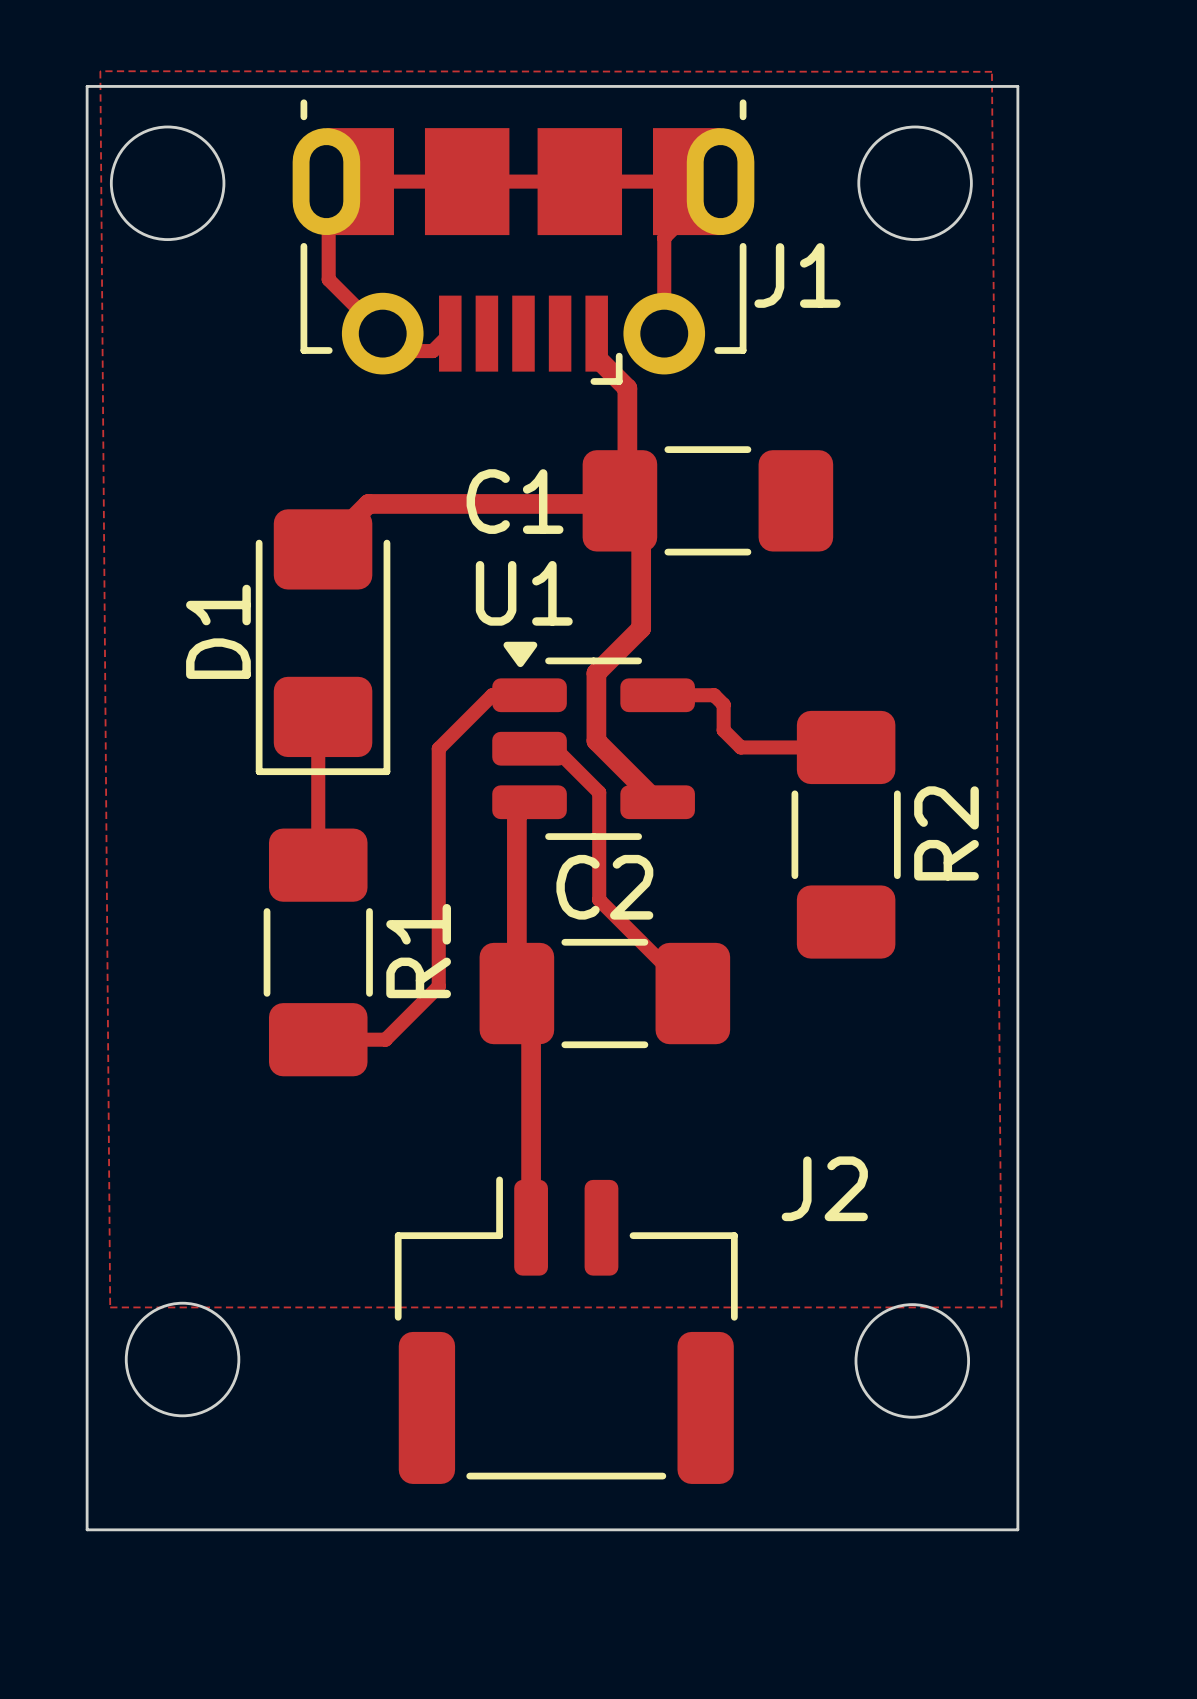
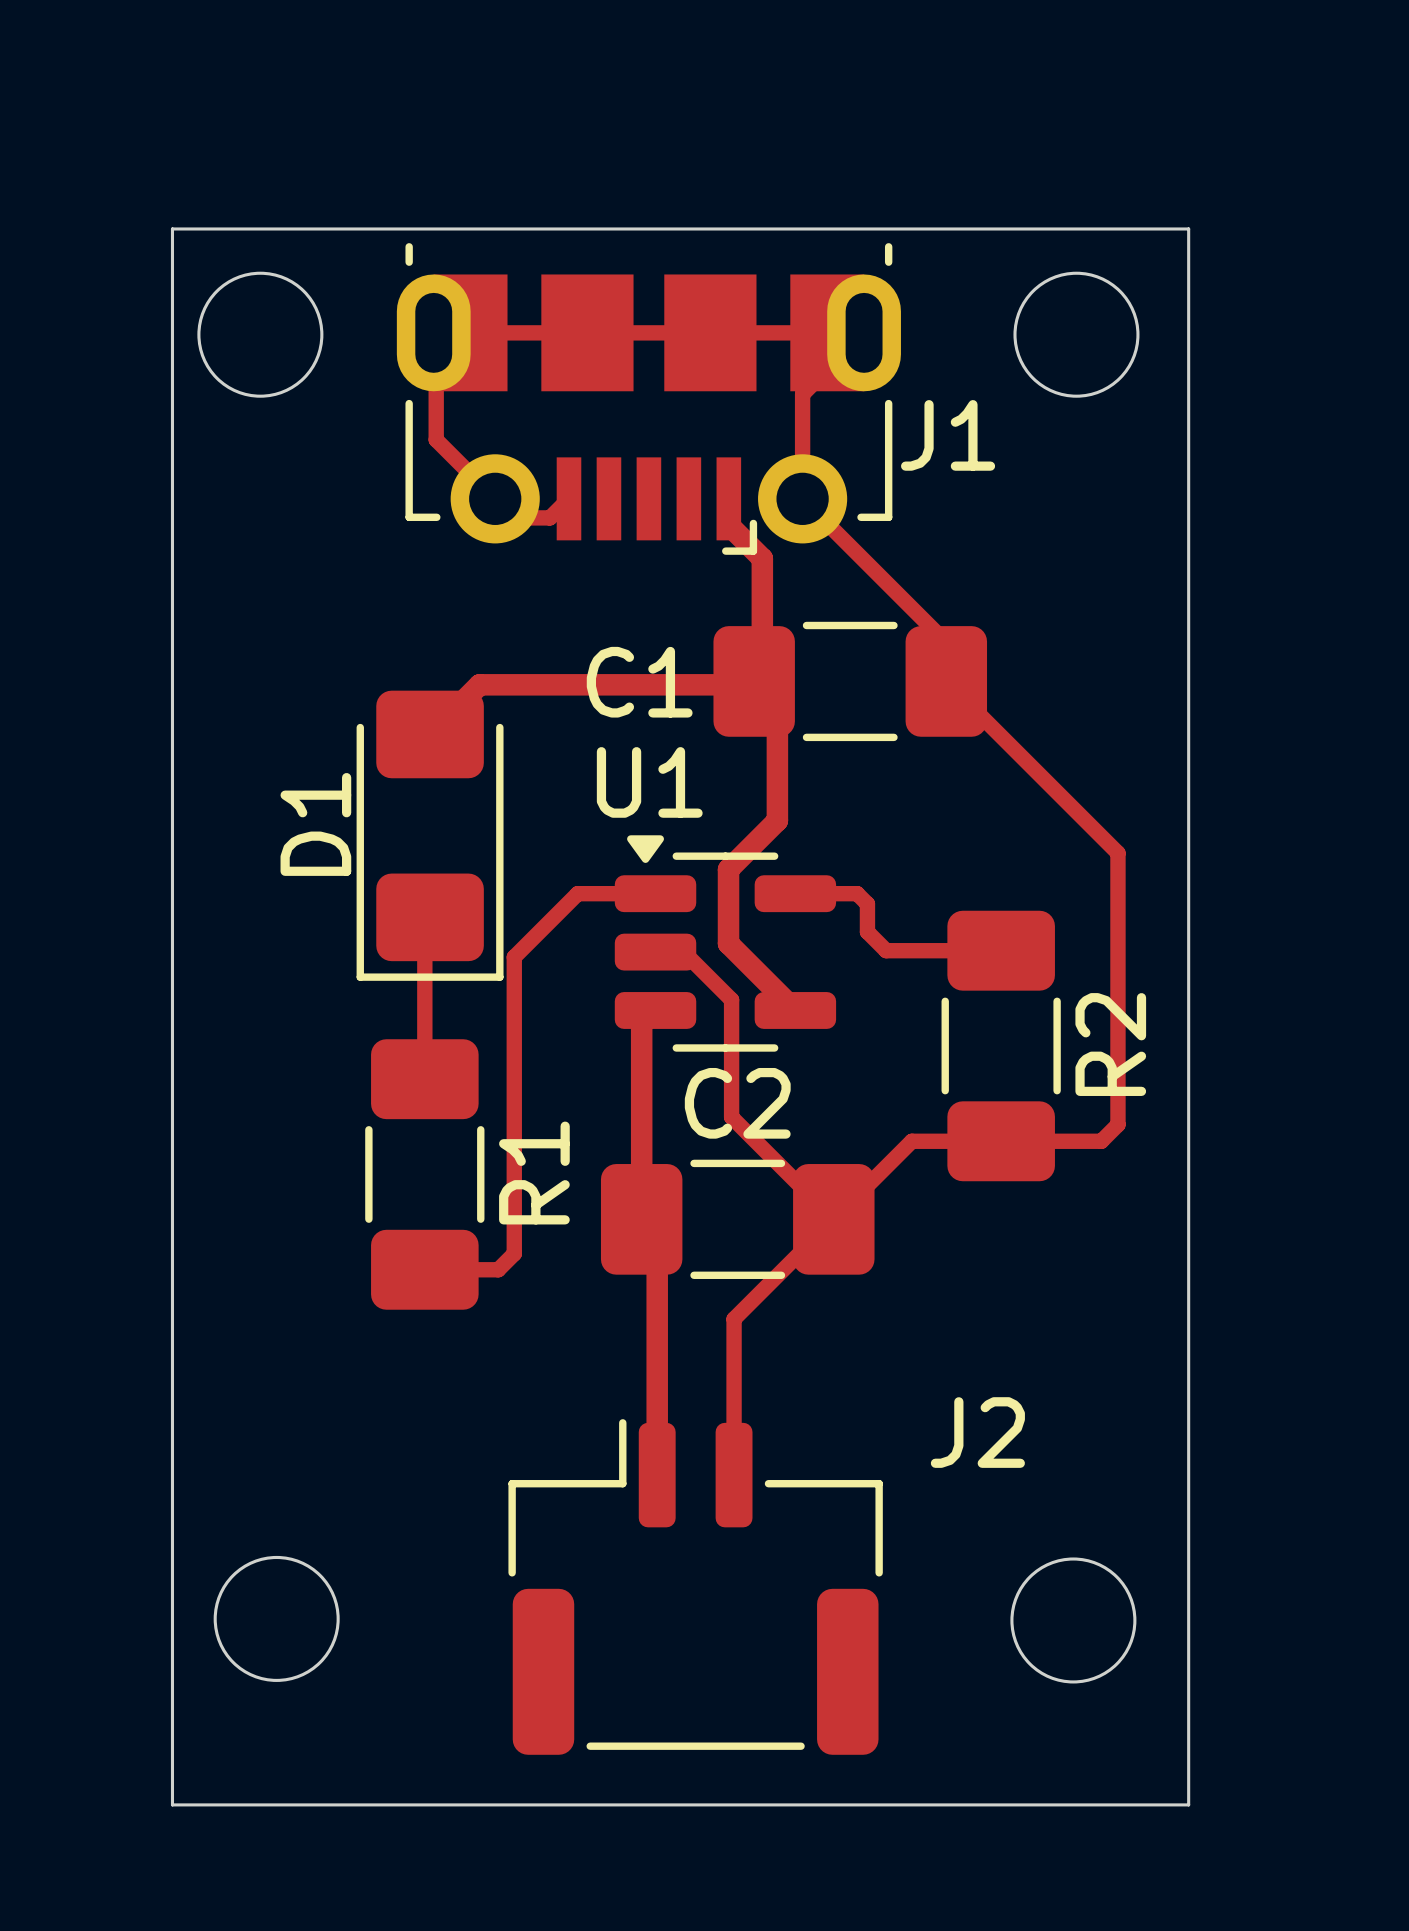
top zone outline: (100, 71) (110, 1307) (1001, 1307) (991, 71) (100, 71) -> none
top track: none -> (802, 498) (946, 642) (946, 681) (1117, 853) (1117, 1124) (1101, 1141) (911, 1141) (734, 1319) (734, 1475)
top track: (492, 695) (438, 748) (438, 986) (400, 1025) -> (614, 893) (577, 893) (514, 957) (514, 1253)

